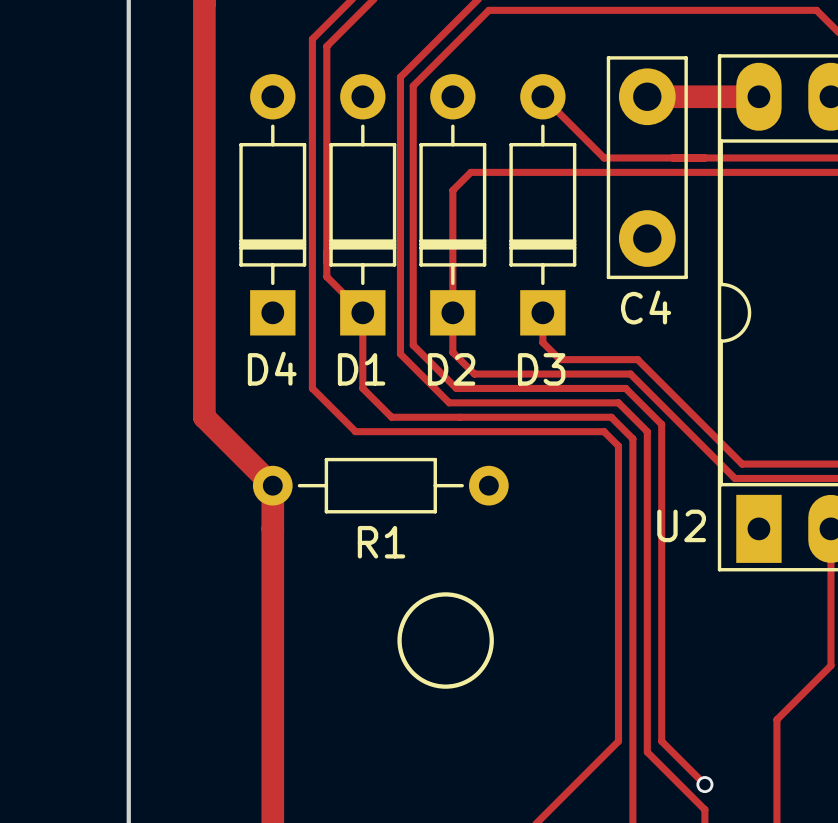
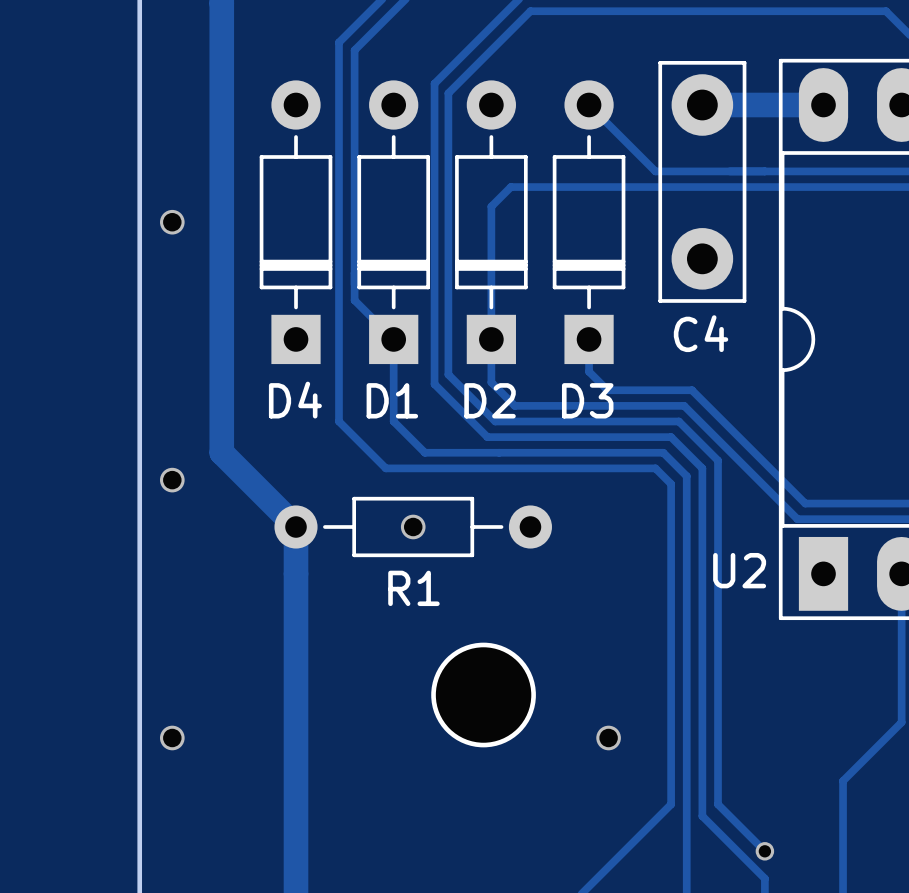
via: none -> (172, 222)
via: none -> (172, 480)
via: none -> (413, 526)
via: none -> (172, 737)
via: none -> (608, 737)

